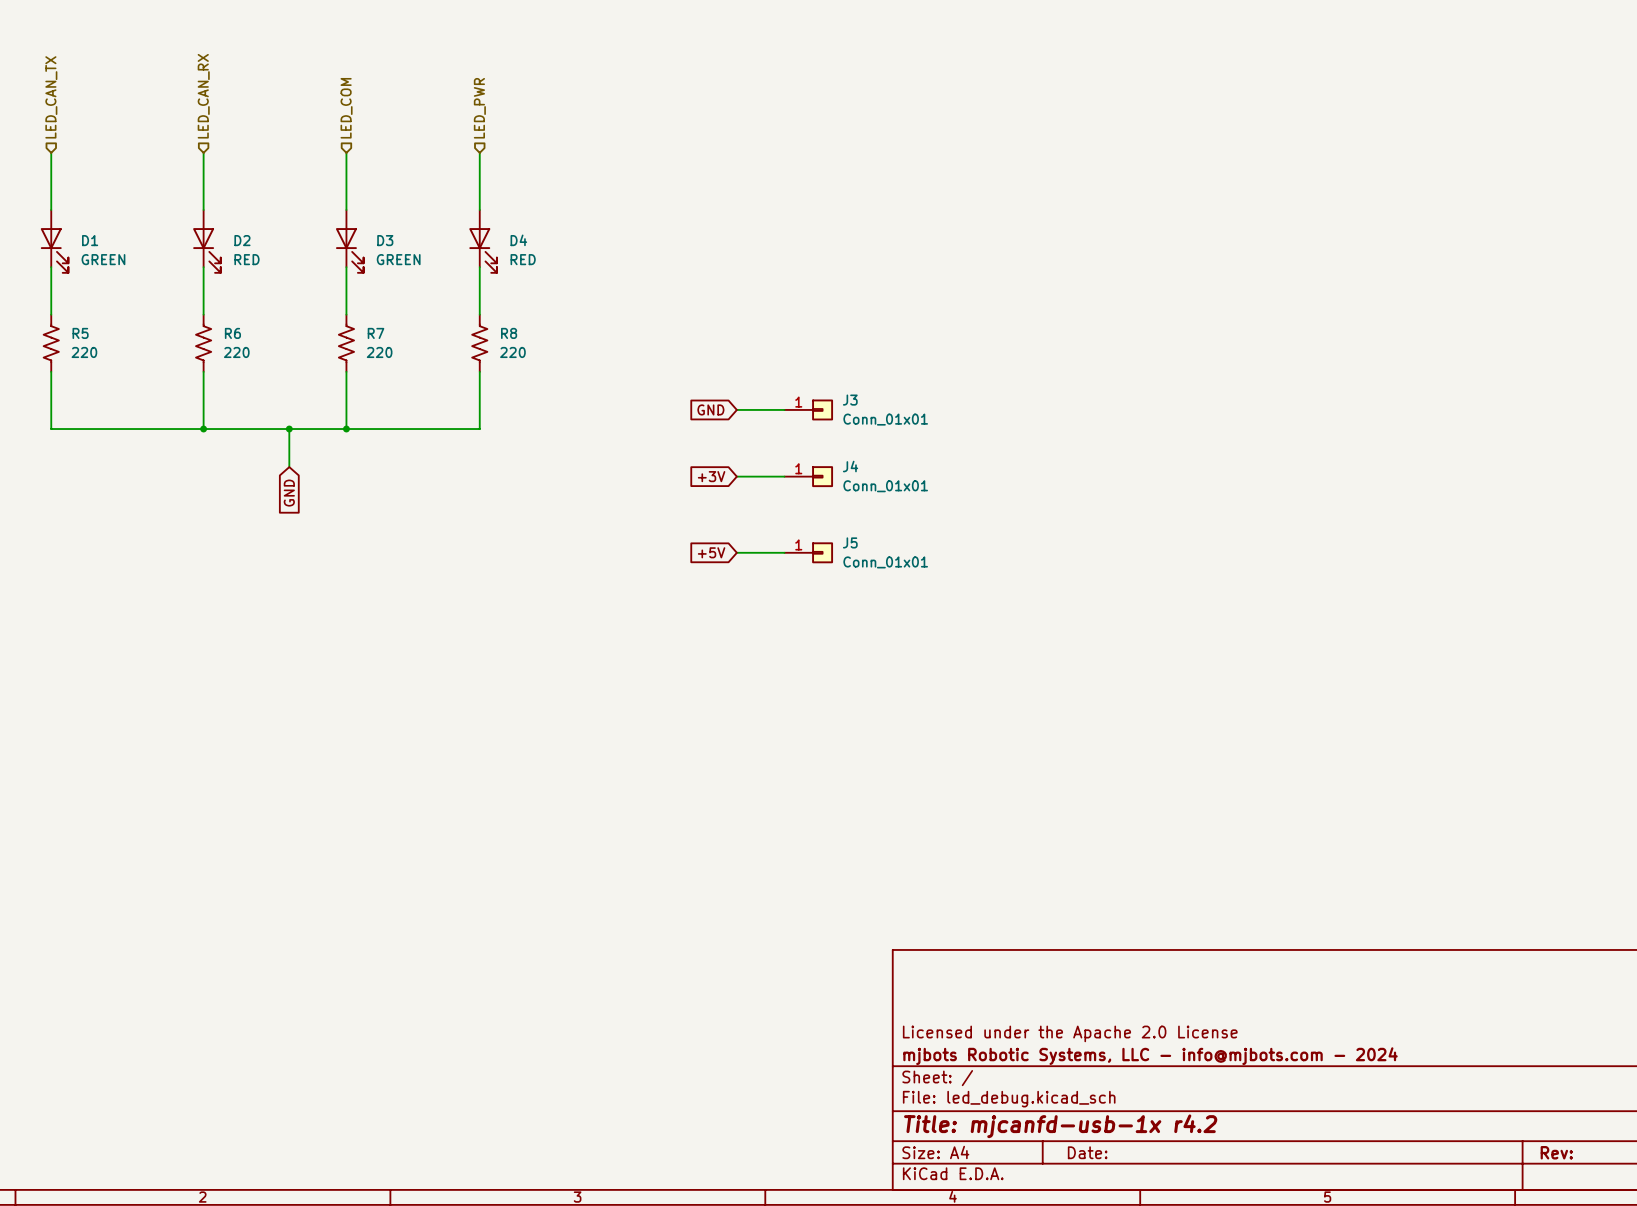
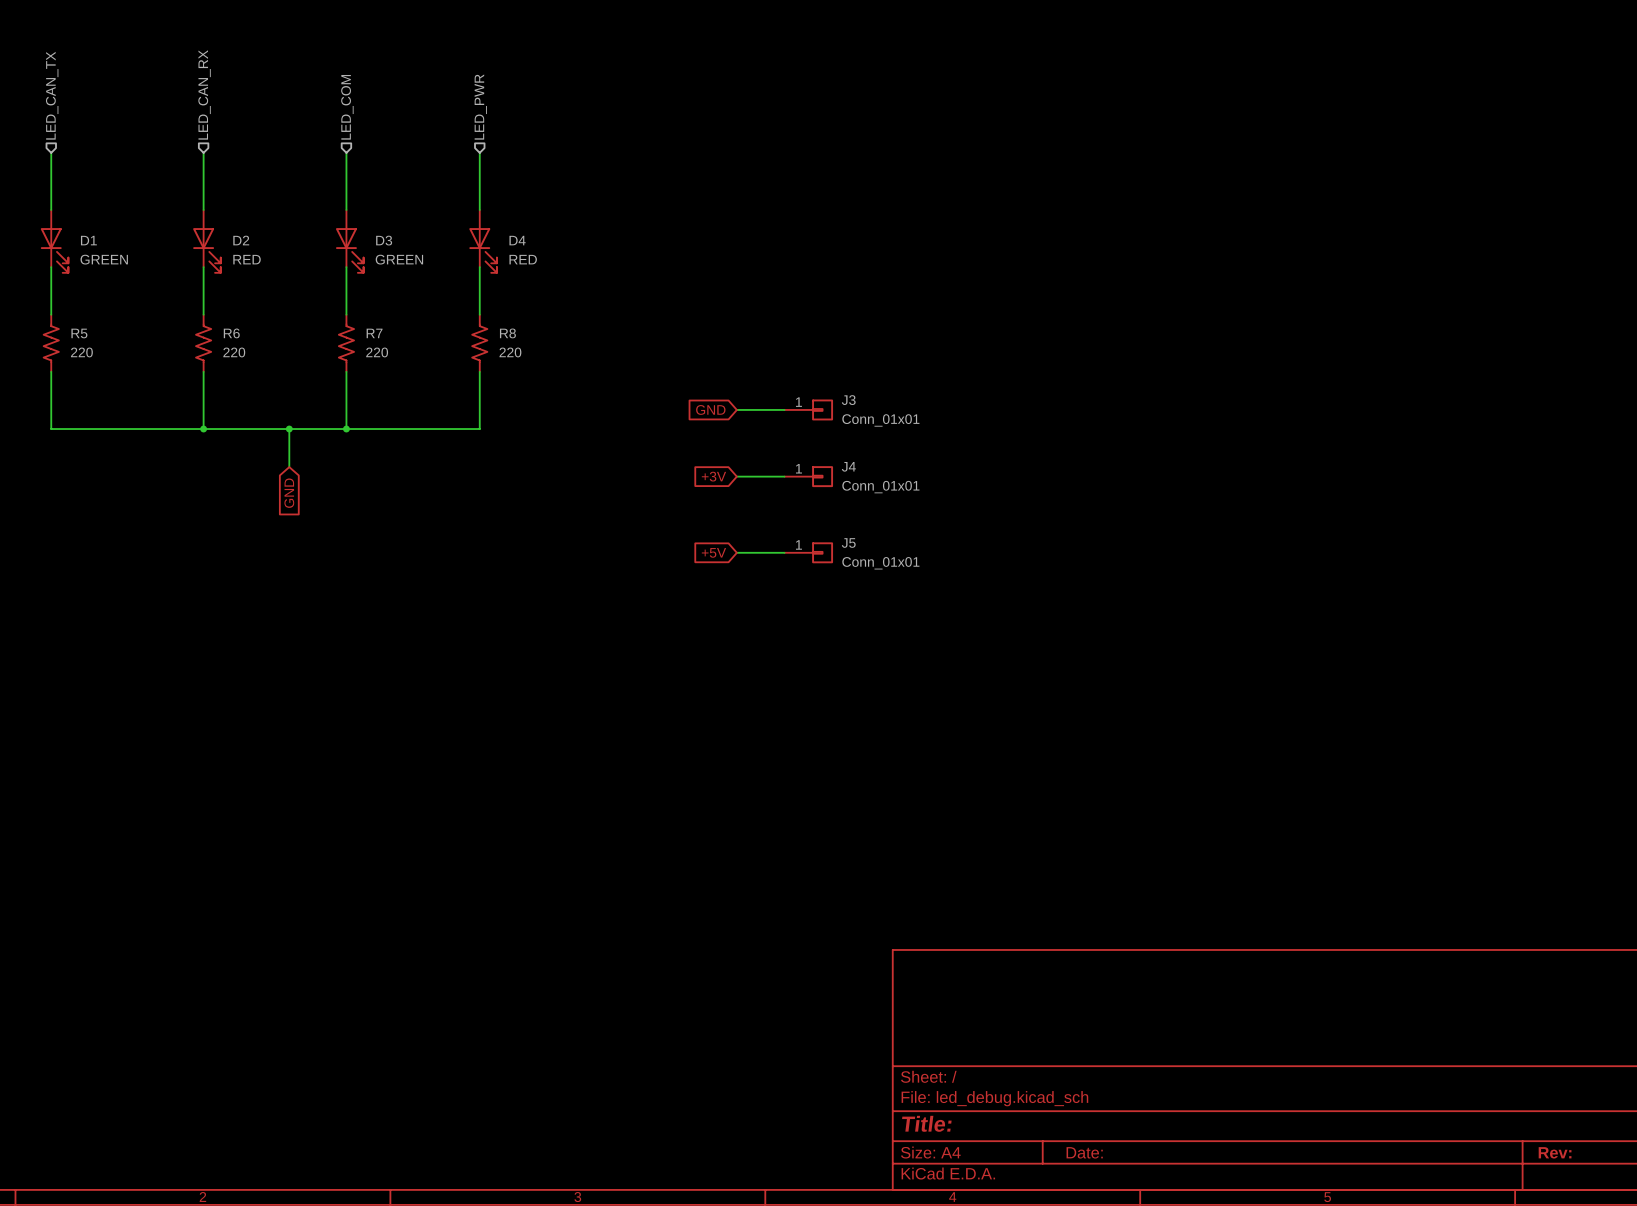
title block: Licensed under the Apache 2.0 License (1070, 1033) -> none
title block: mjbots Robotic Systems, LLC - info@mjbots.com - 2024 (1150, 1056) -> none
title block: Title: mjcanfd-usb-1x r4.2 (1060, 1126) -> Title: (926, 1123)

